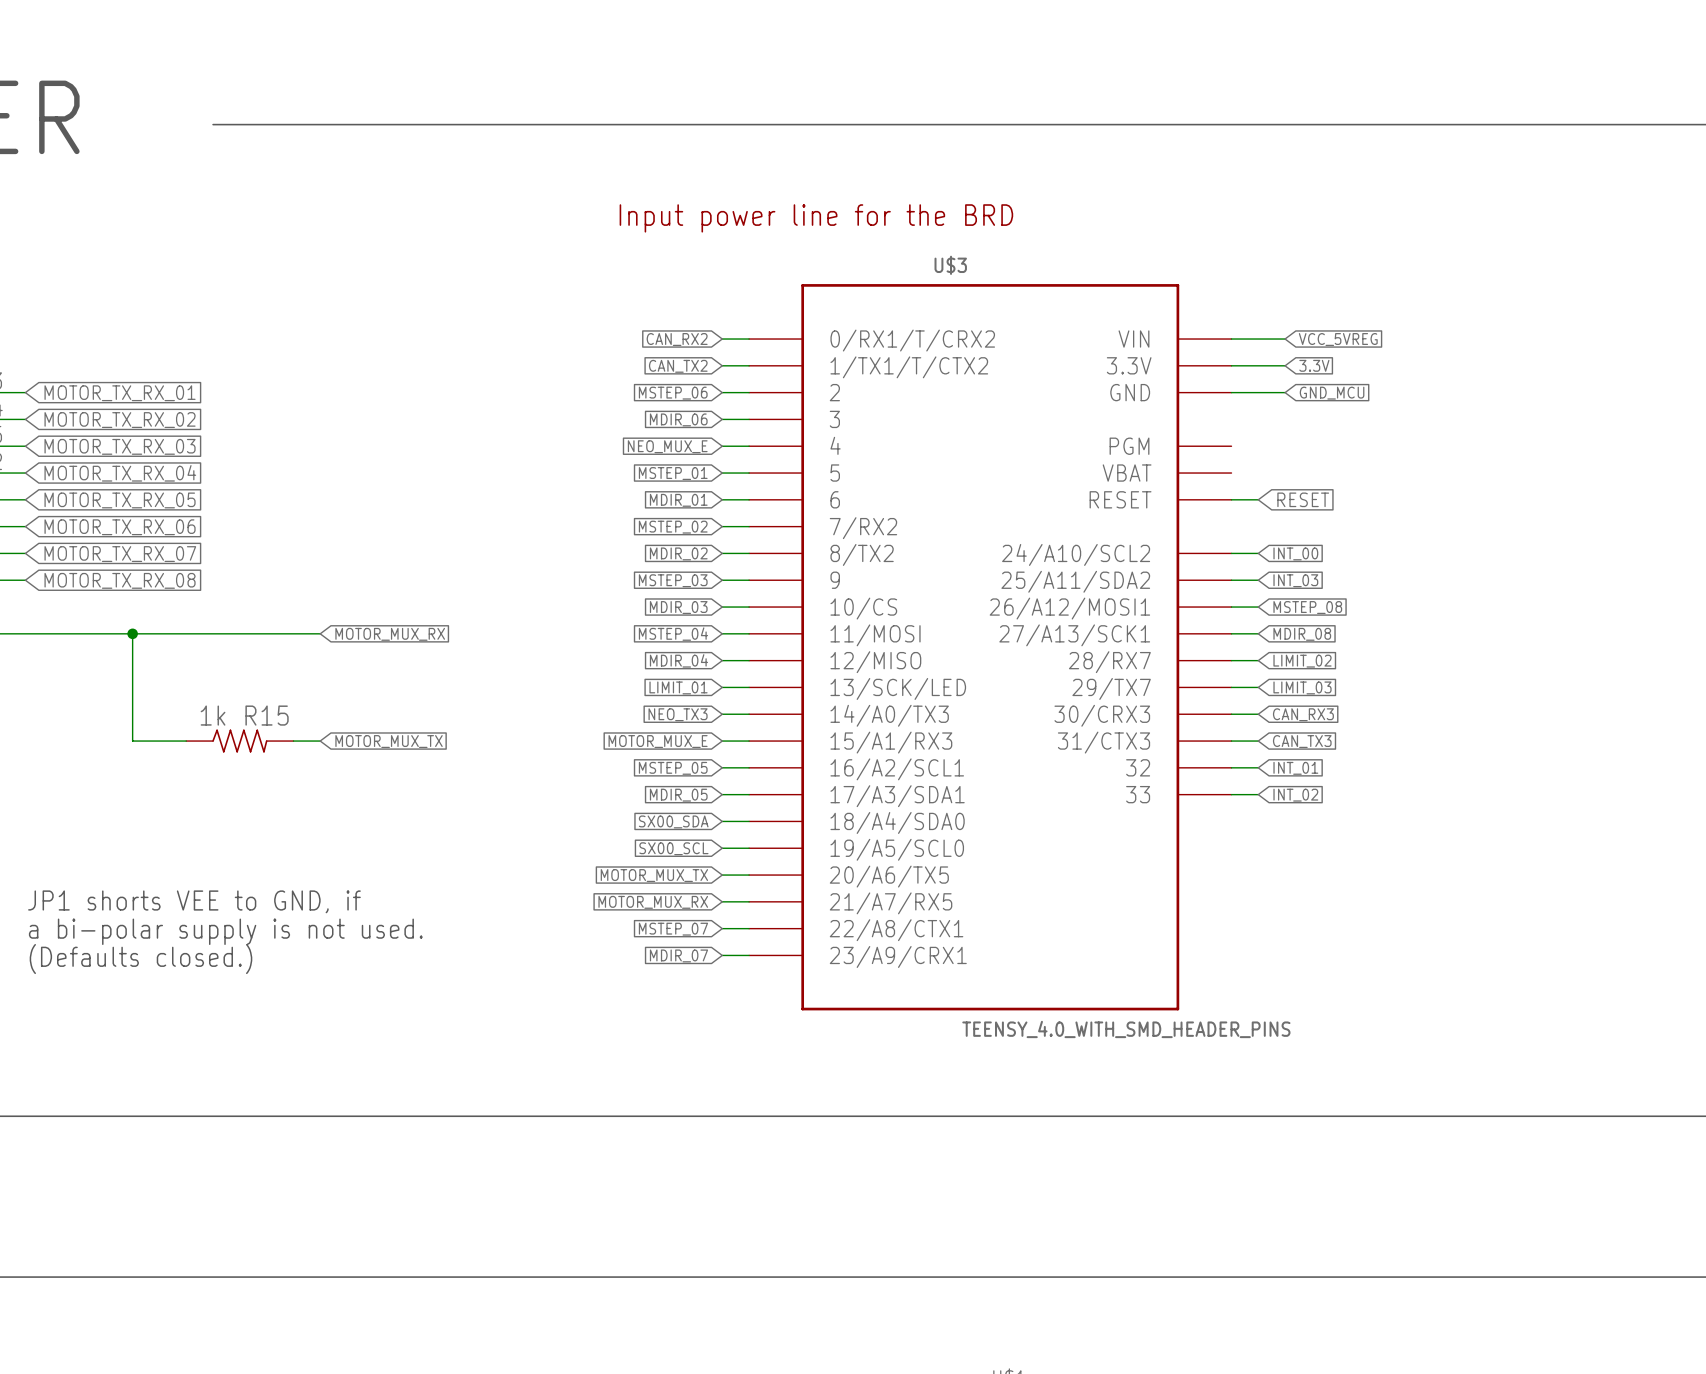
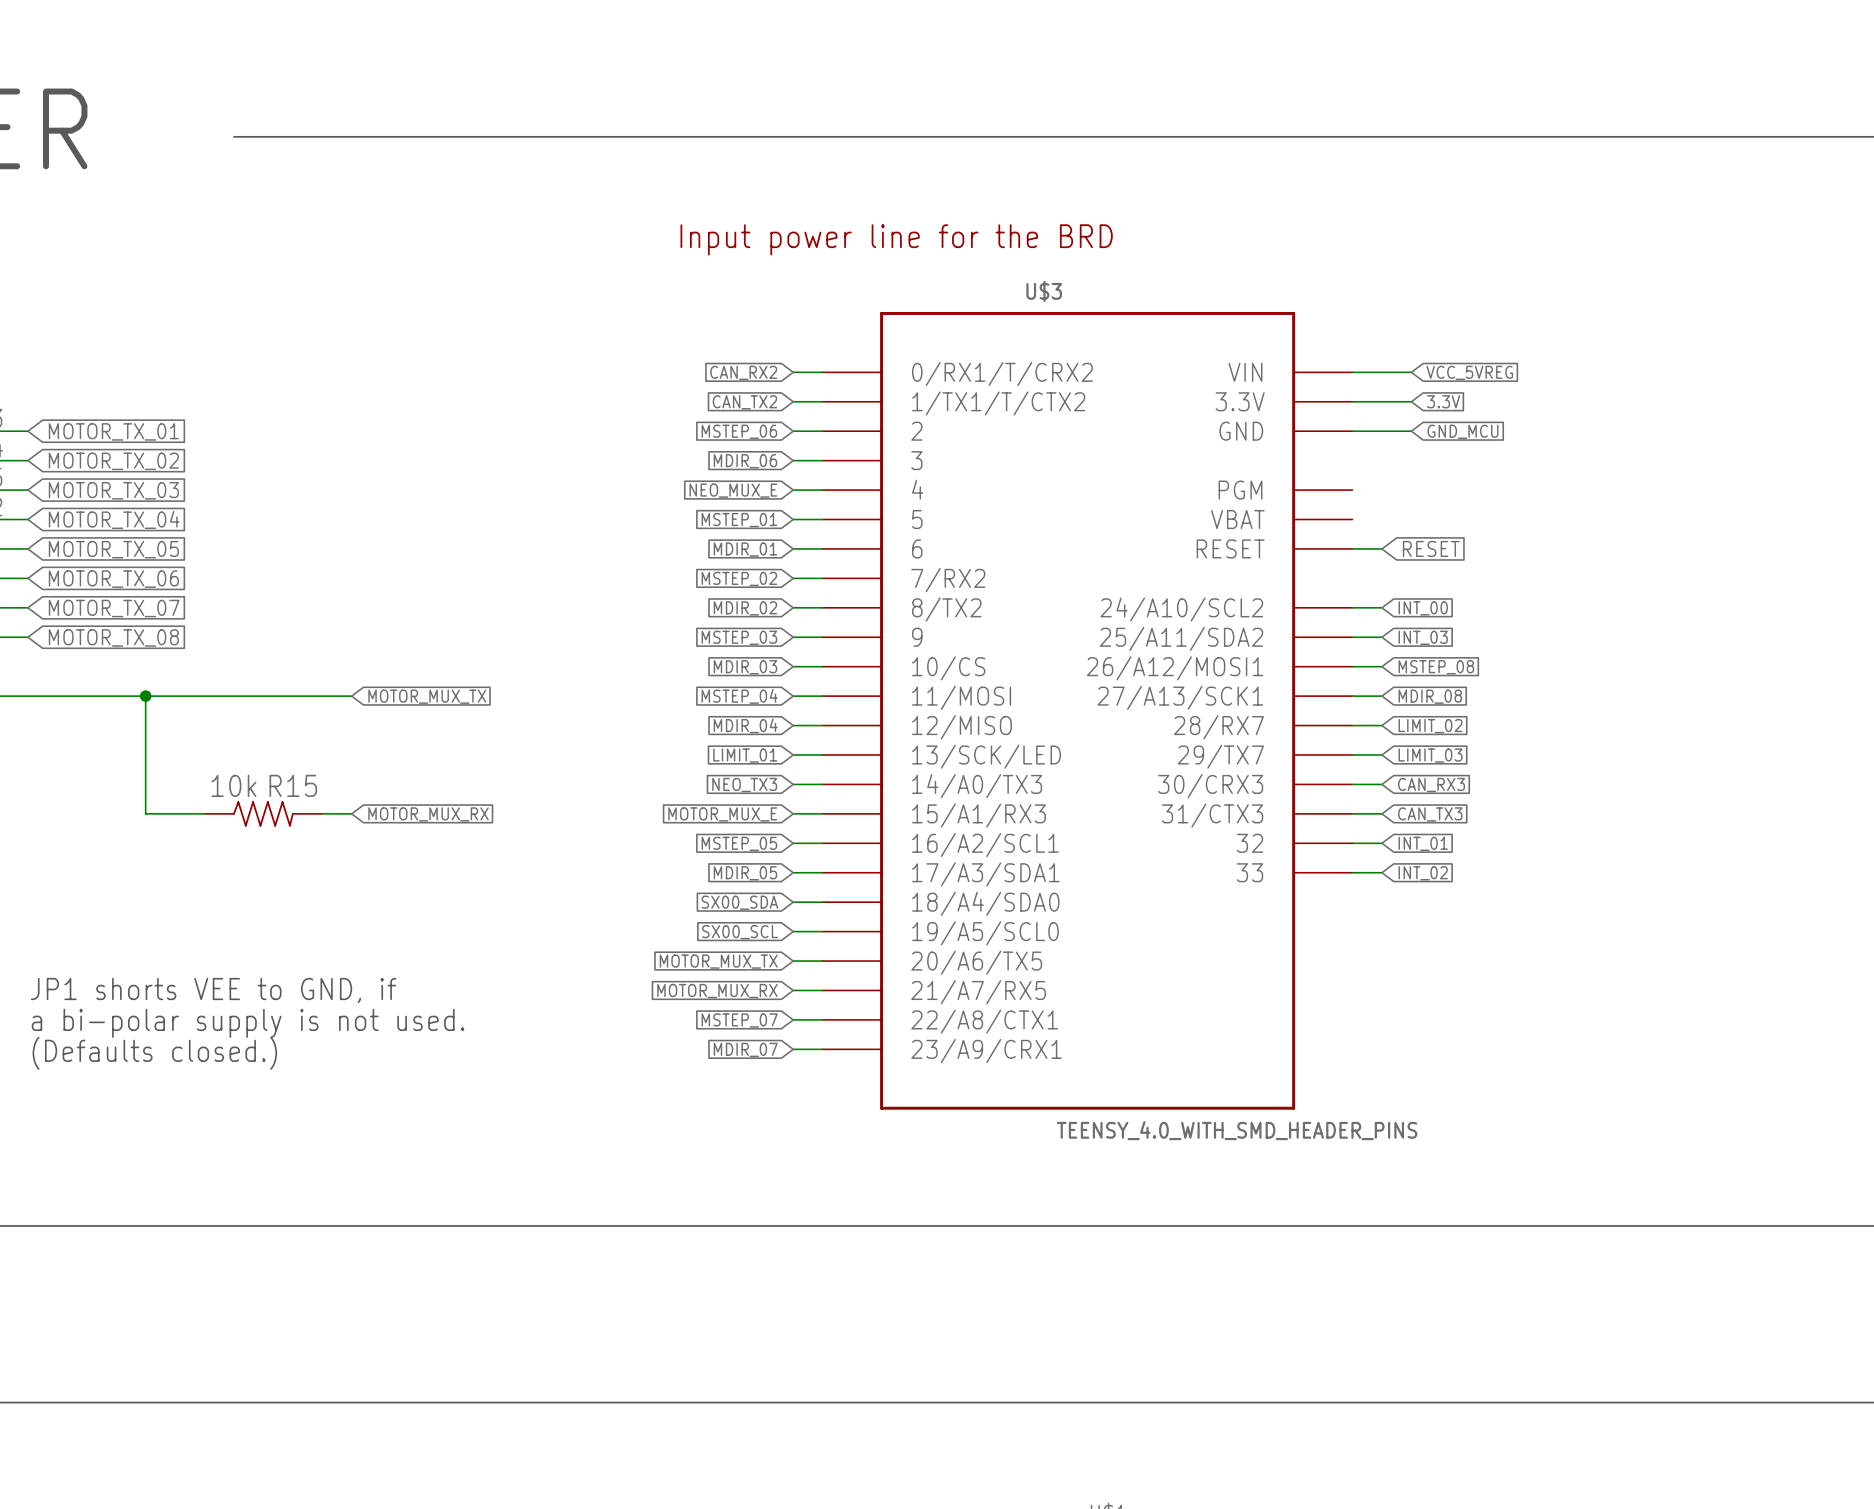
global label: MOTOR_TX_RX_01 (120, 393) -> MOTOR_TX_01 (113, 431)
global label: MOTOR_TX_RX_02 (120, 420) -> MOTOR_TX_02 (113, 461)
global label: MOTOR_TX_RX_03 (120, 446) -> MOTOR_TX_03 (113, 490)
global label: MOTOR_TX_RX_04 (120, 473) -> MOTOR_TX_04 (114, 519)
global label: MOTOR_TX_RX_05 (120, 500) -> MOTOR_TX_05 (113, 549)
global label: MOTOR_TX_RX_06 (120, 527) -> MOTOR_TX_06 (113, 579)
global label: MOTOR_TX_RX_07 (120, 554) -> MOTOR_TX_07 (114, 608)
global label: MOTOR_TX_RX_08 (120, 580) -> MOTOR_TX_08 (113, 637)
global label: MOTOR_MUX_RX (390, 634) -> MOTOR_MUX_TX (427, 696)
R15 value: 1k (213, 715) -> 10k (233, 785)
global label: MOTOR_MUX_TX (389, 741) -> MOTOR_MUX_RX (428, 814)

